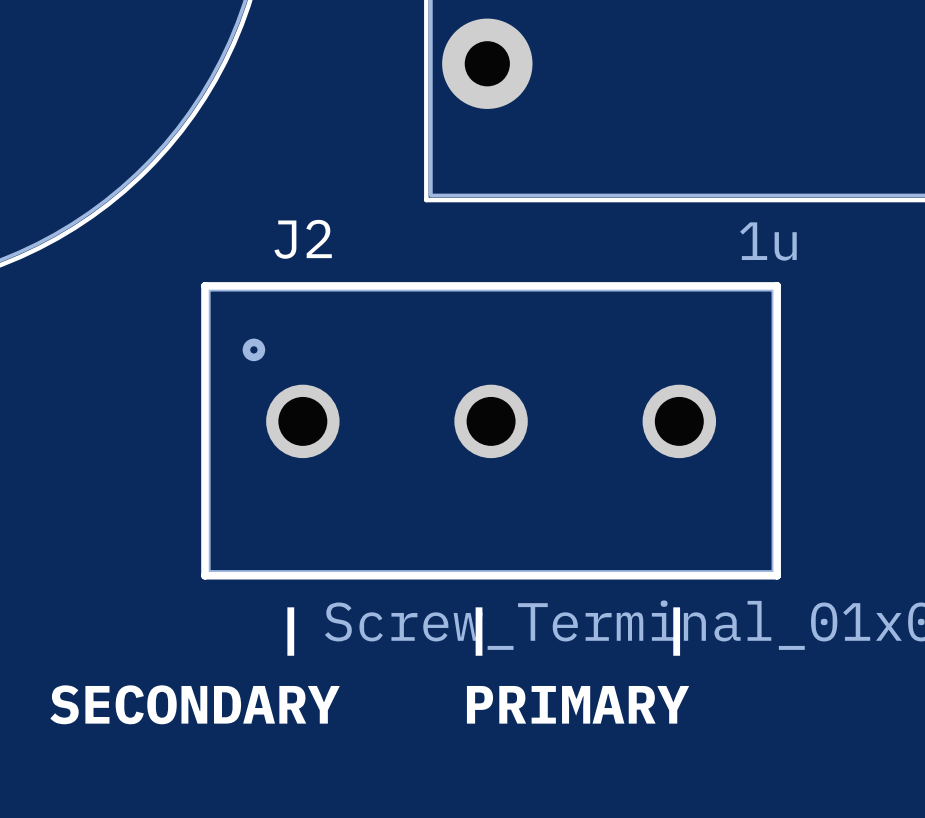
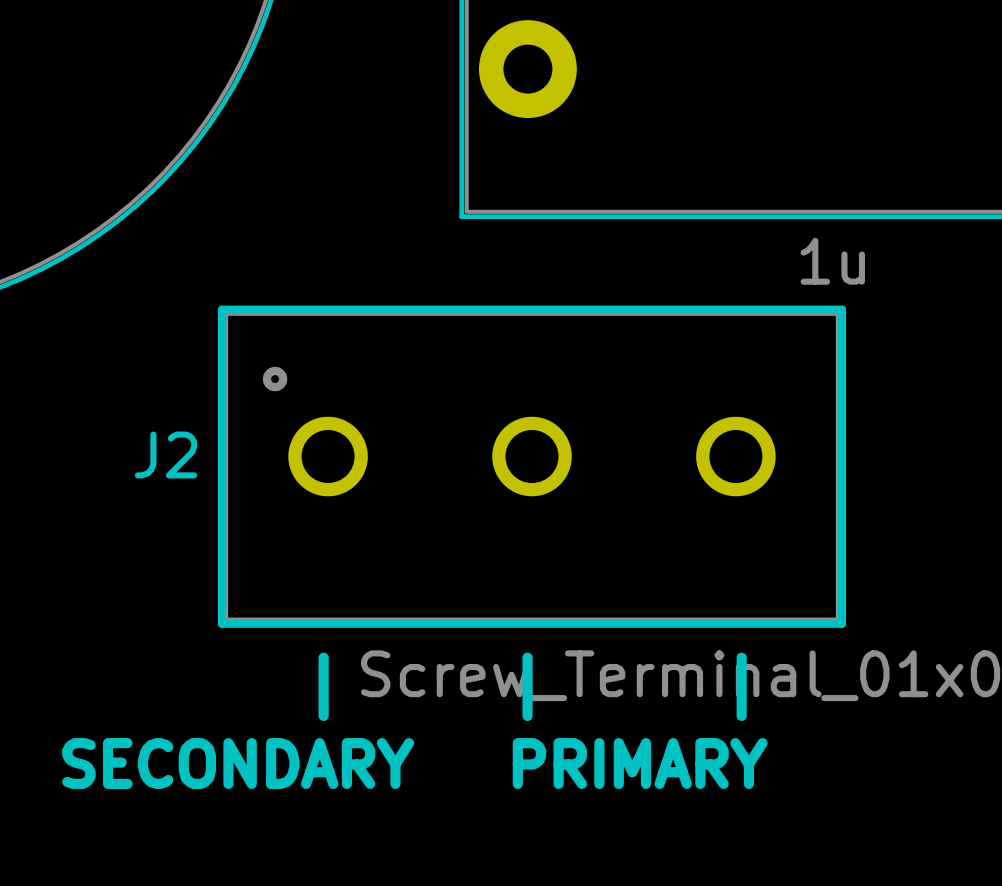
J2 name position: J2 (303, 239) -> J2 (166, 454)

